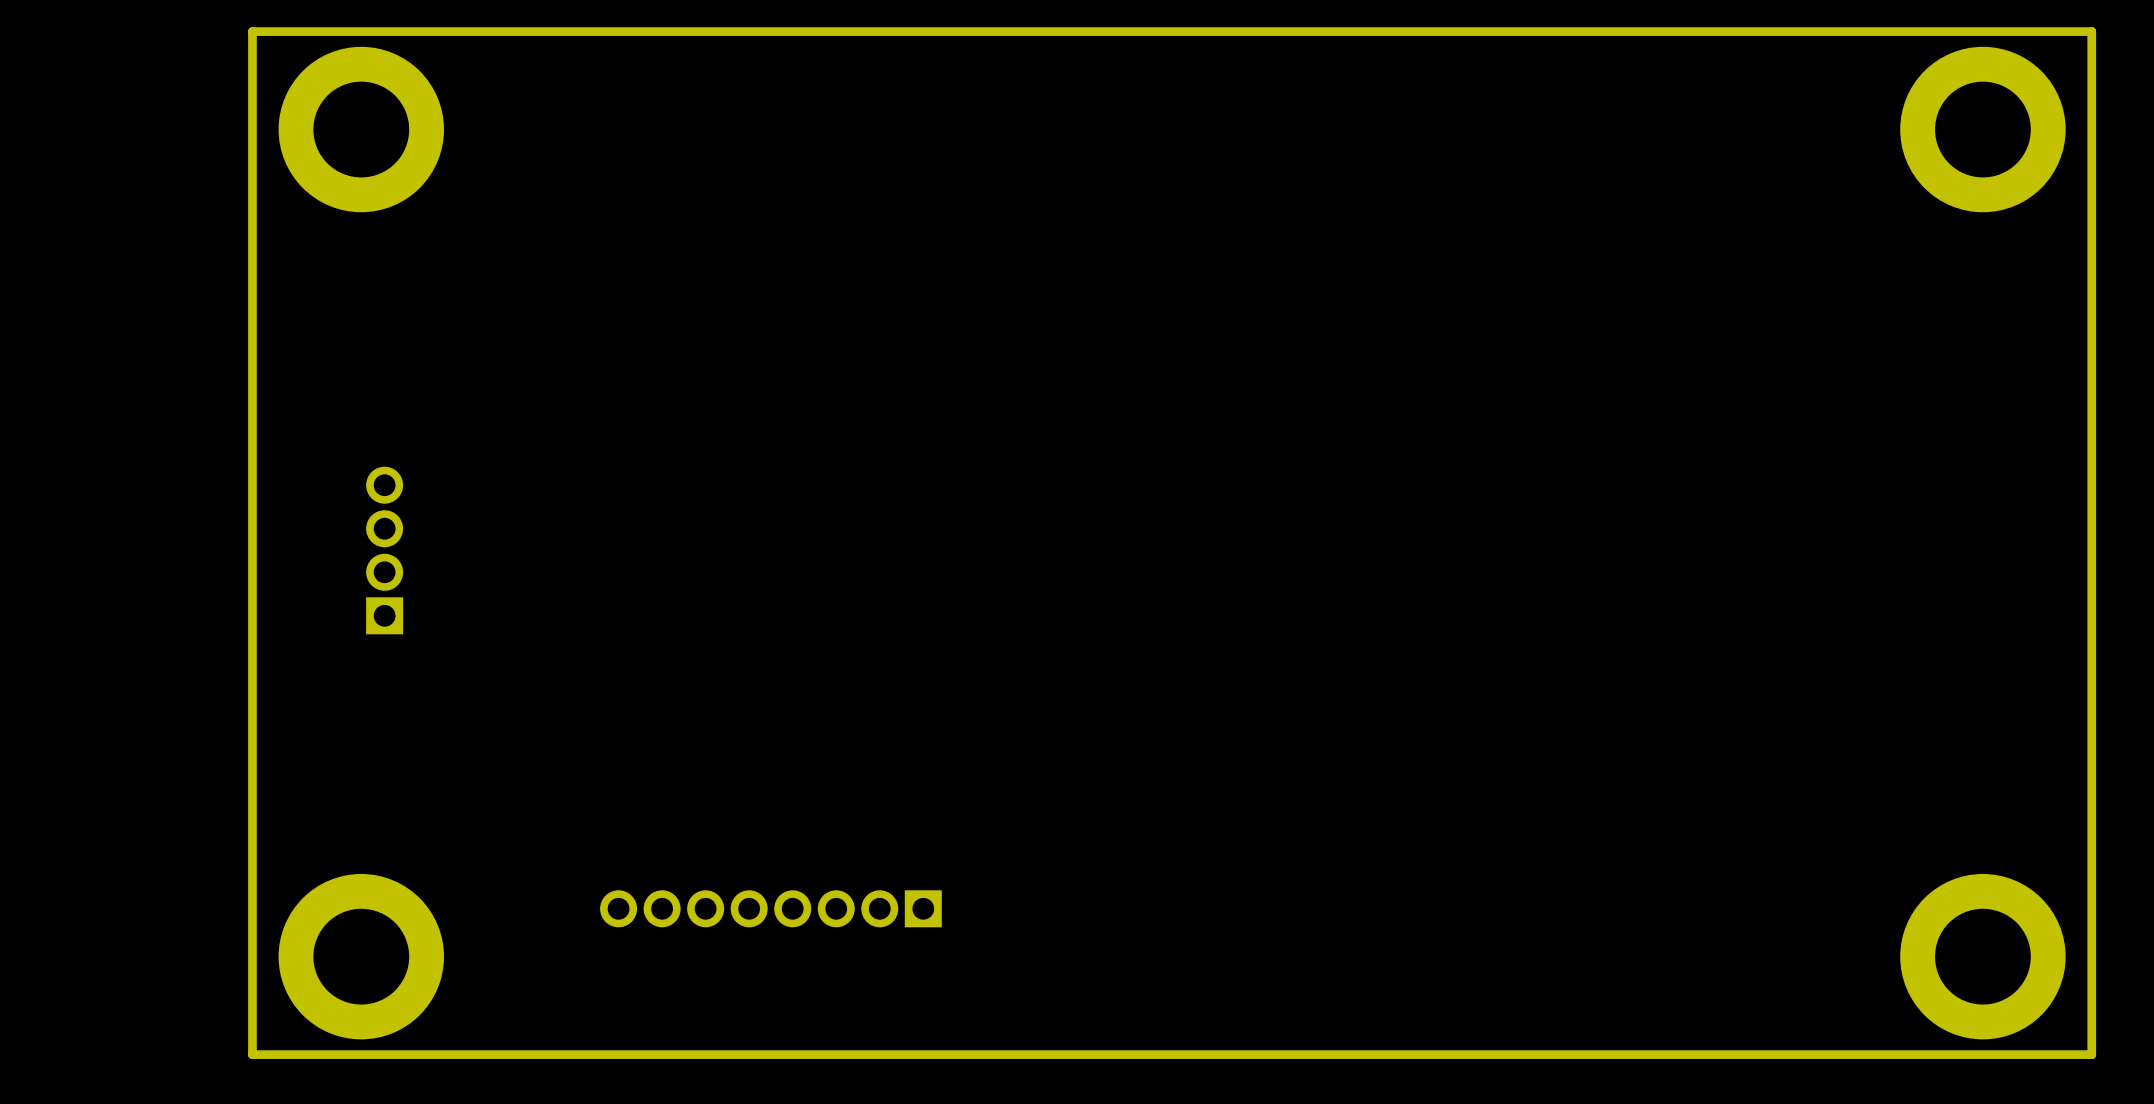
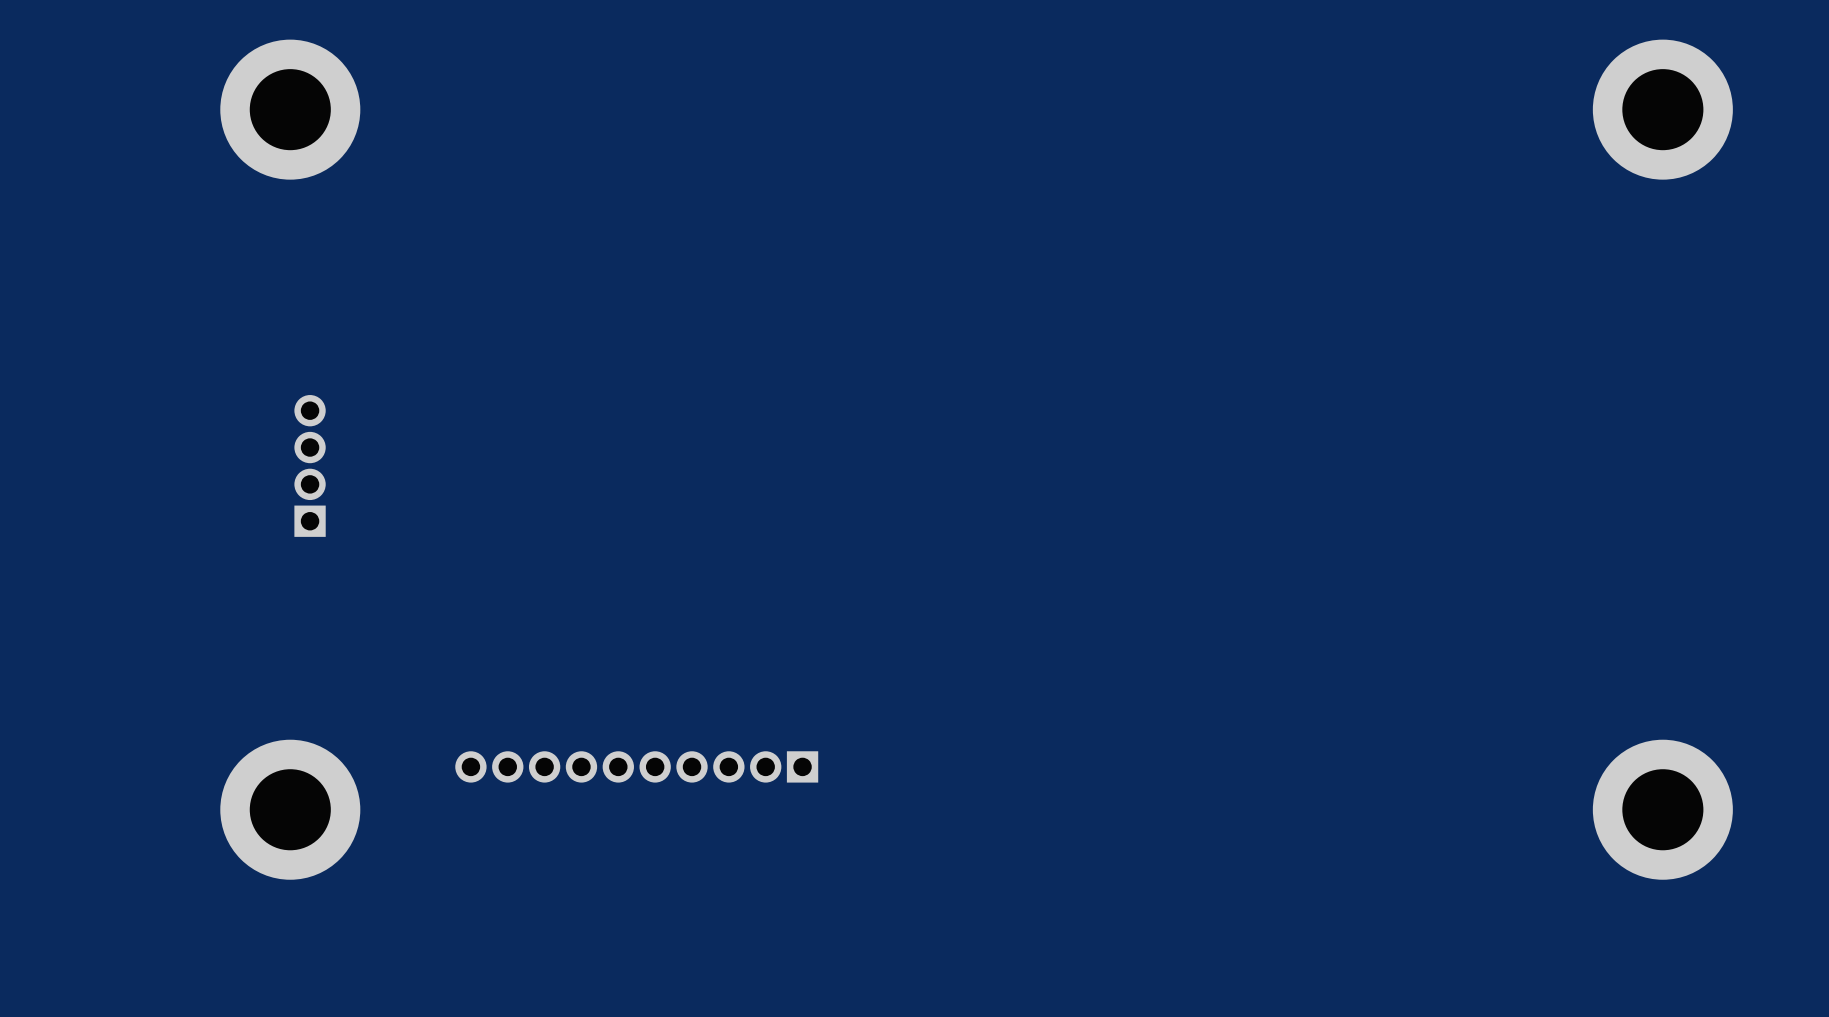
board edge: (2091, 31) (252, 31) (252, 1054) (2091, 1054) (2091, 31) -> none
part footprint: [600, 890, 942, 928] -> [455, 751, 819, 783]

